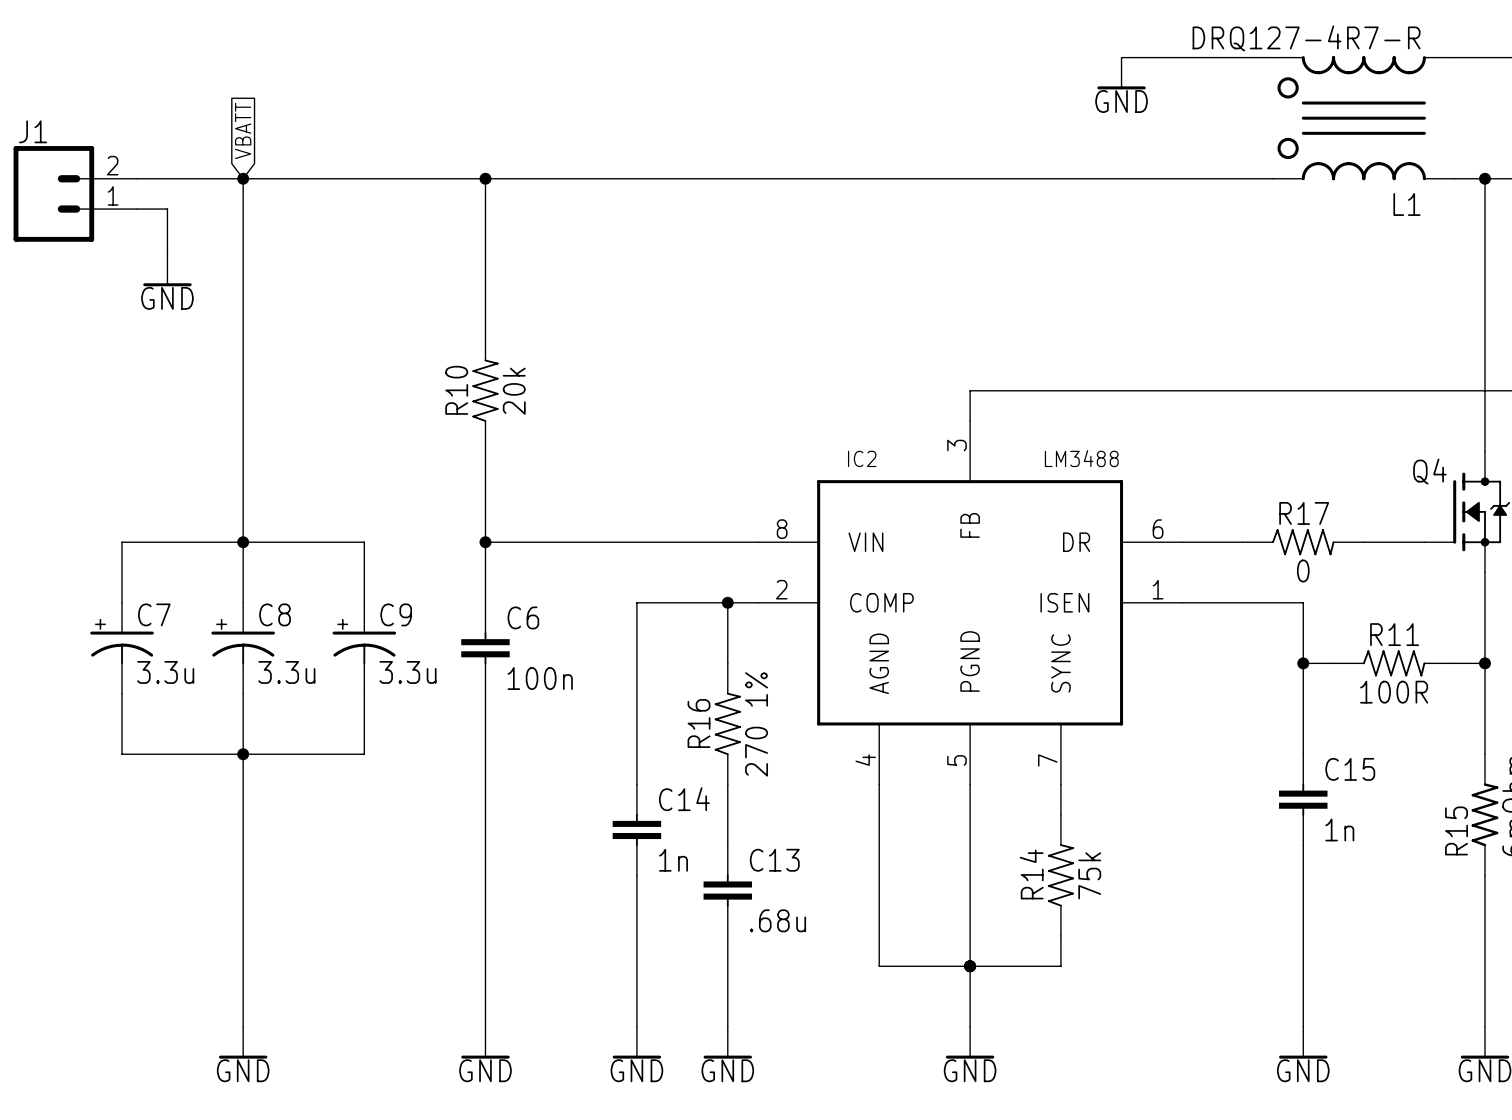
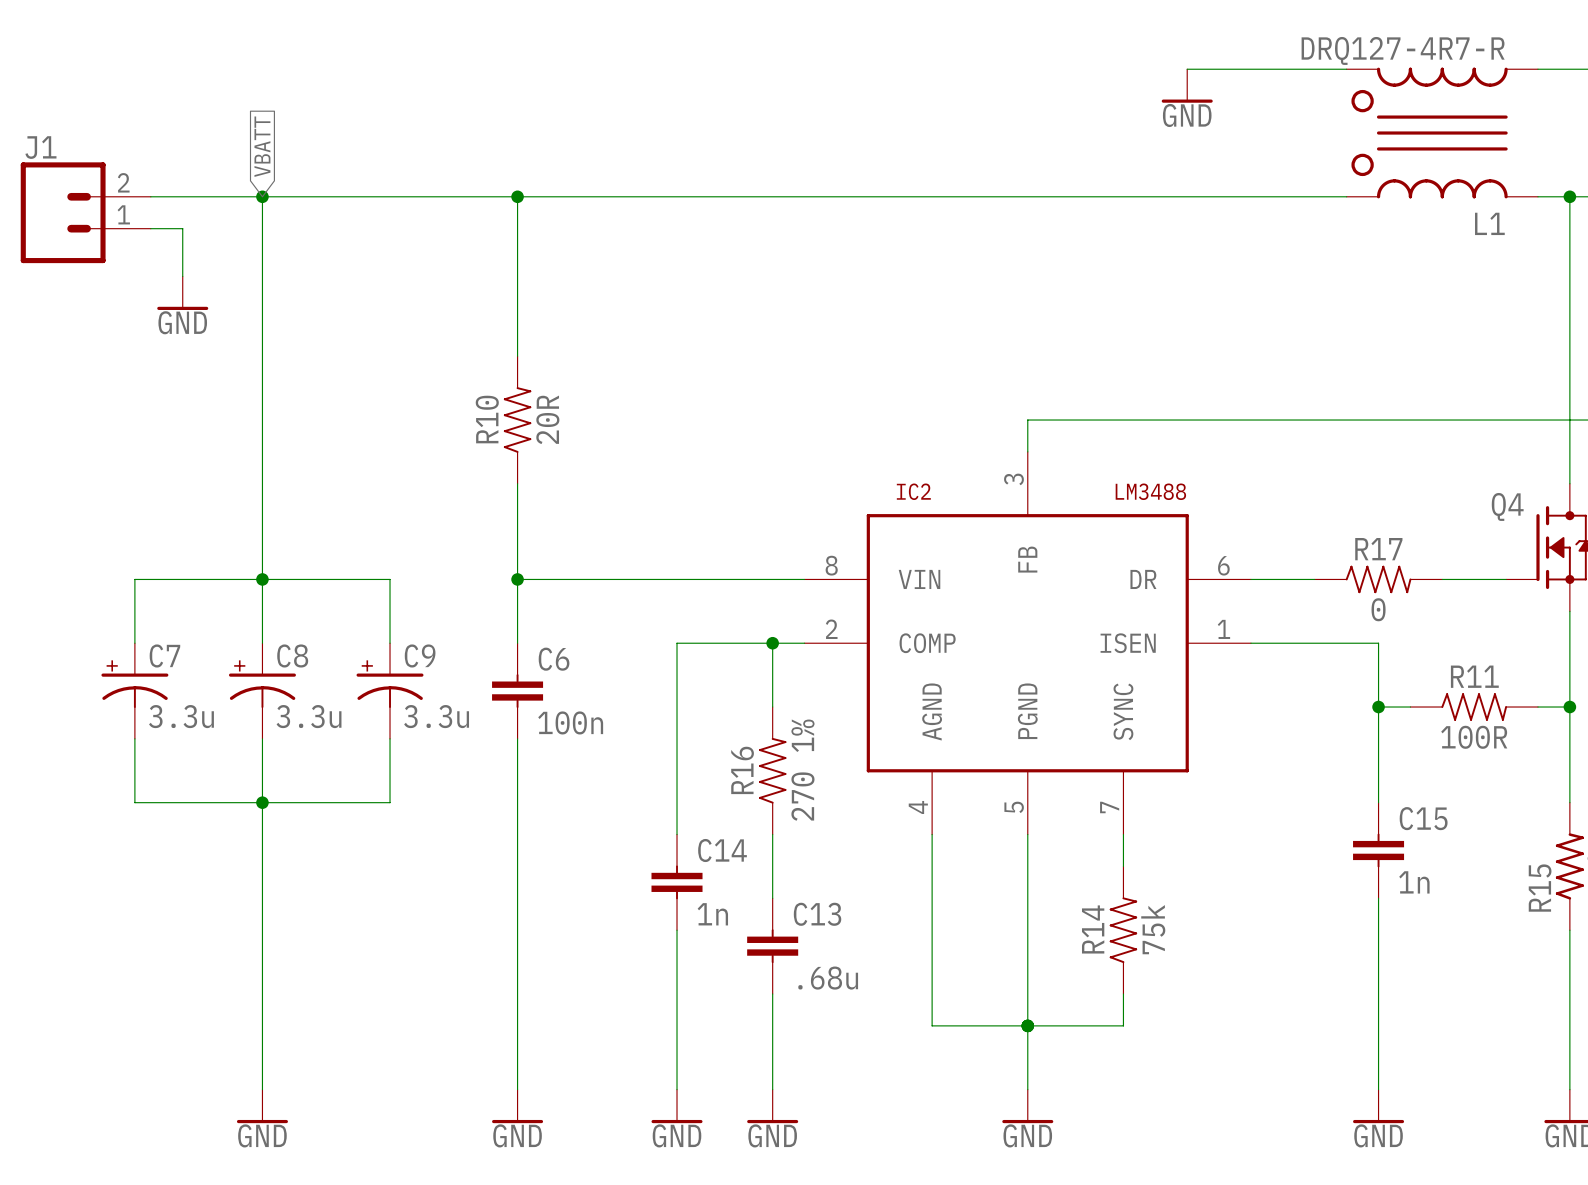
R10 value: 20k (514, 391) -> 20R (547, 419)

